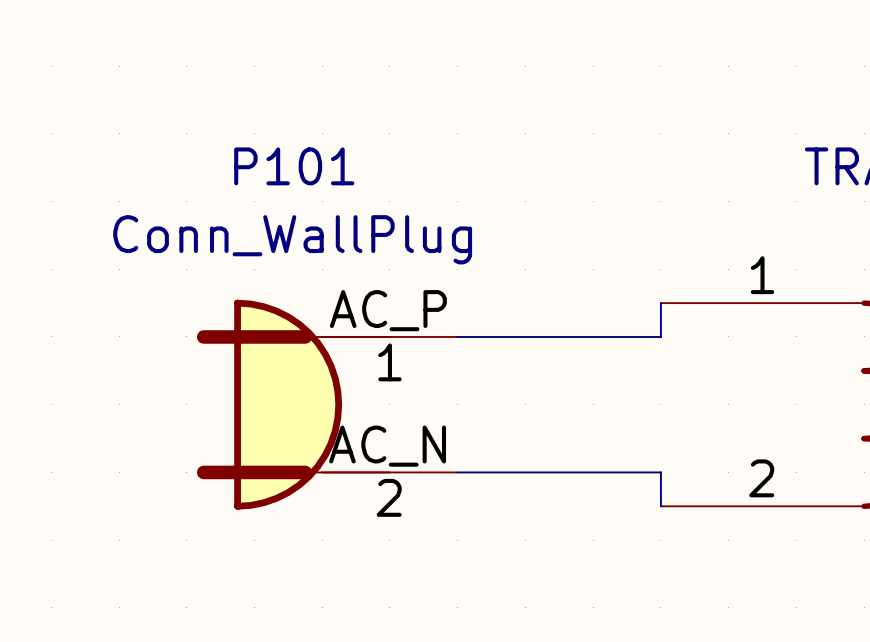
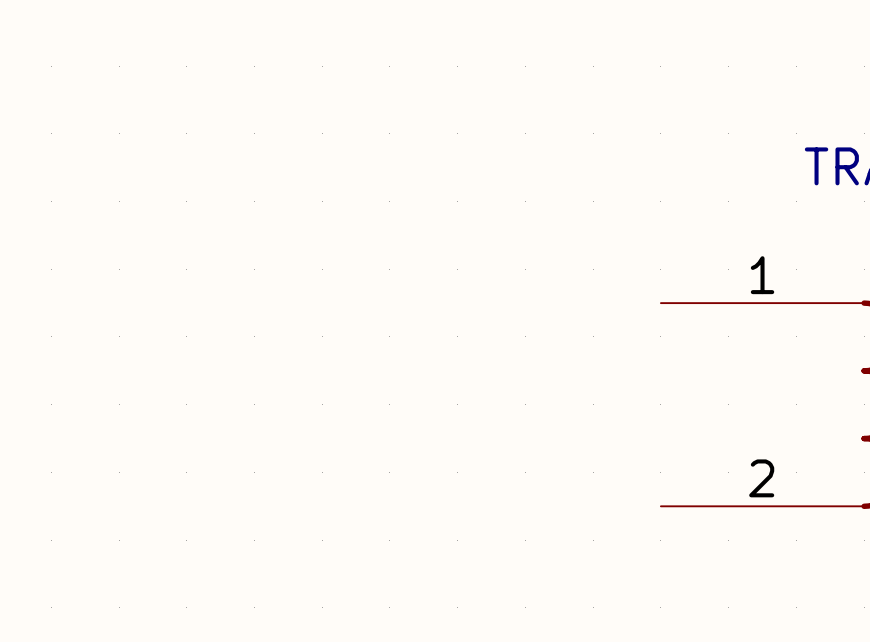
wire: (660, 303) (660, 336) (457, 336) -> none
P101: Conn_WallPlug (327, 404) -> none
wire: (457, 472) (660, 472) (660, 506) -> none

